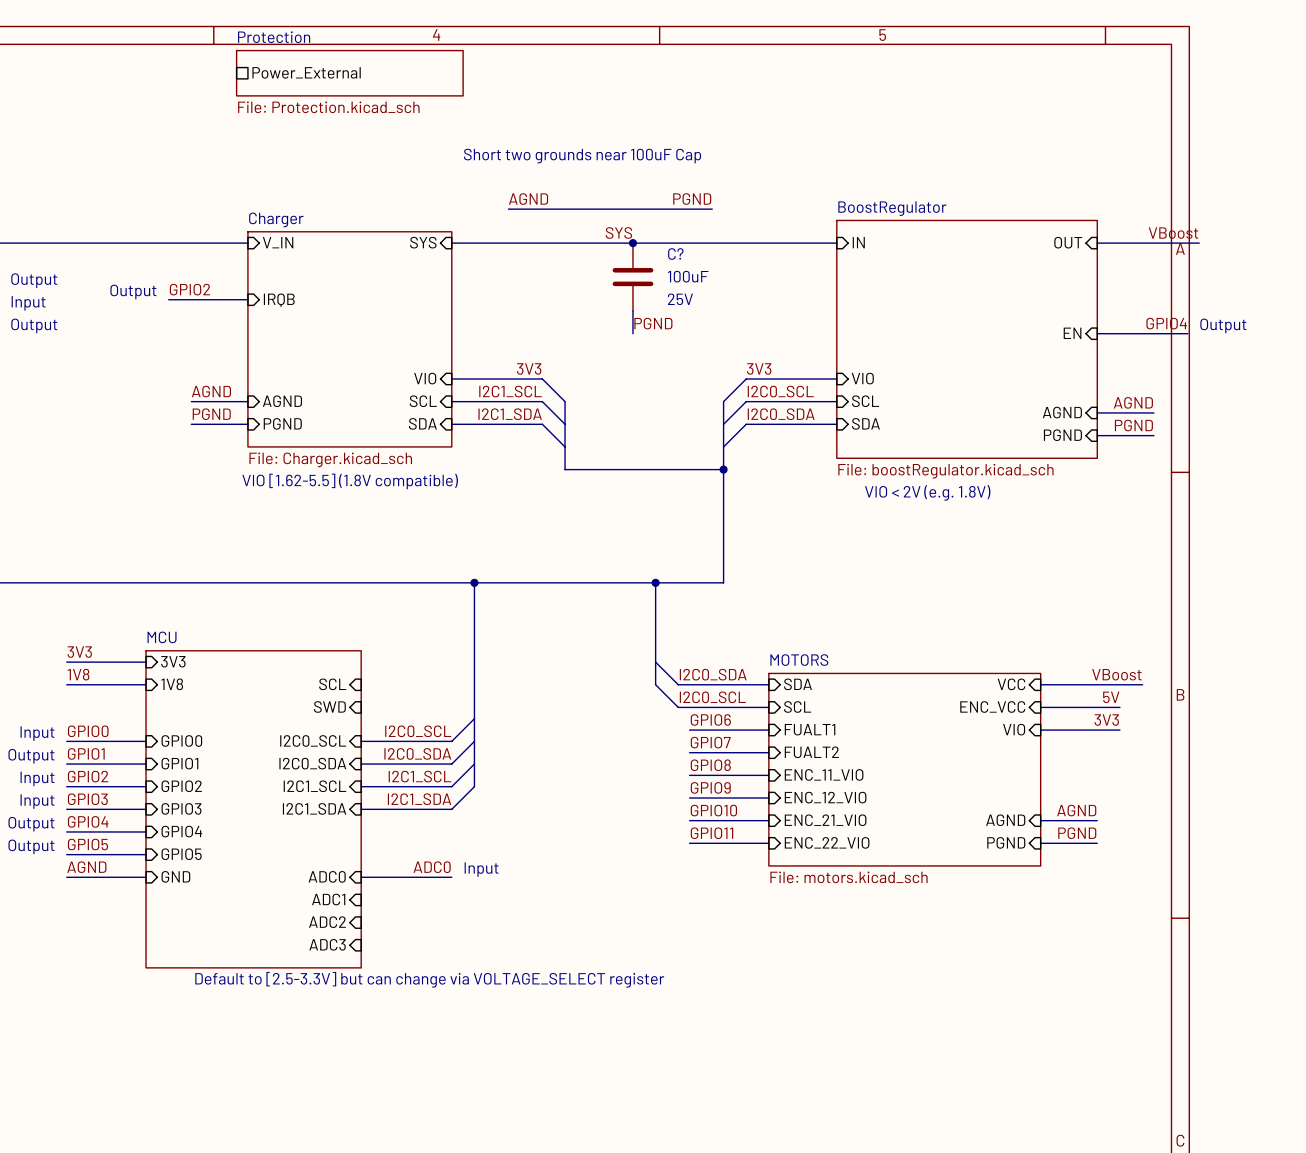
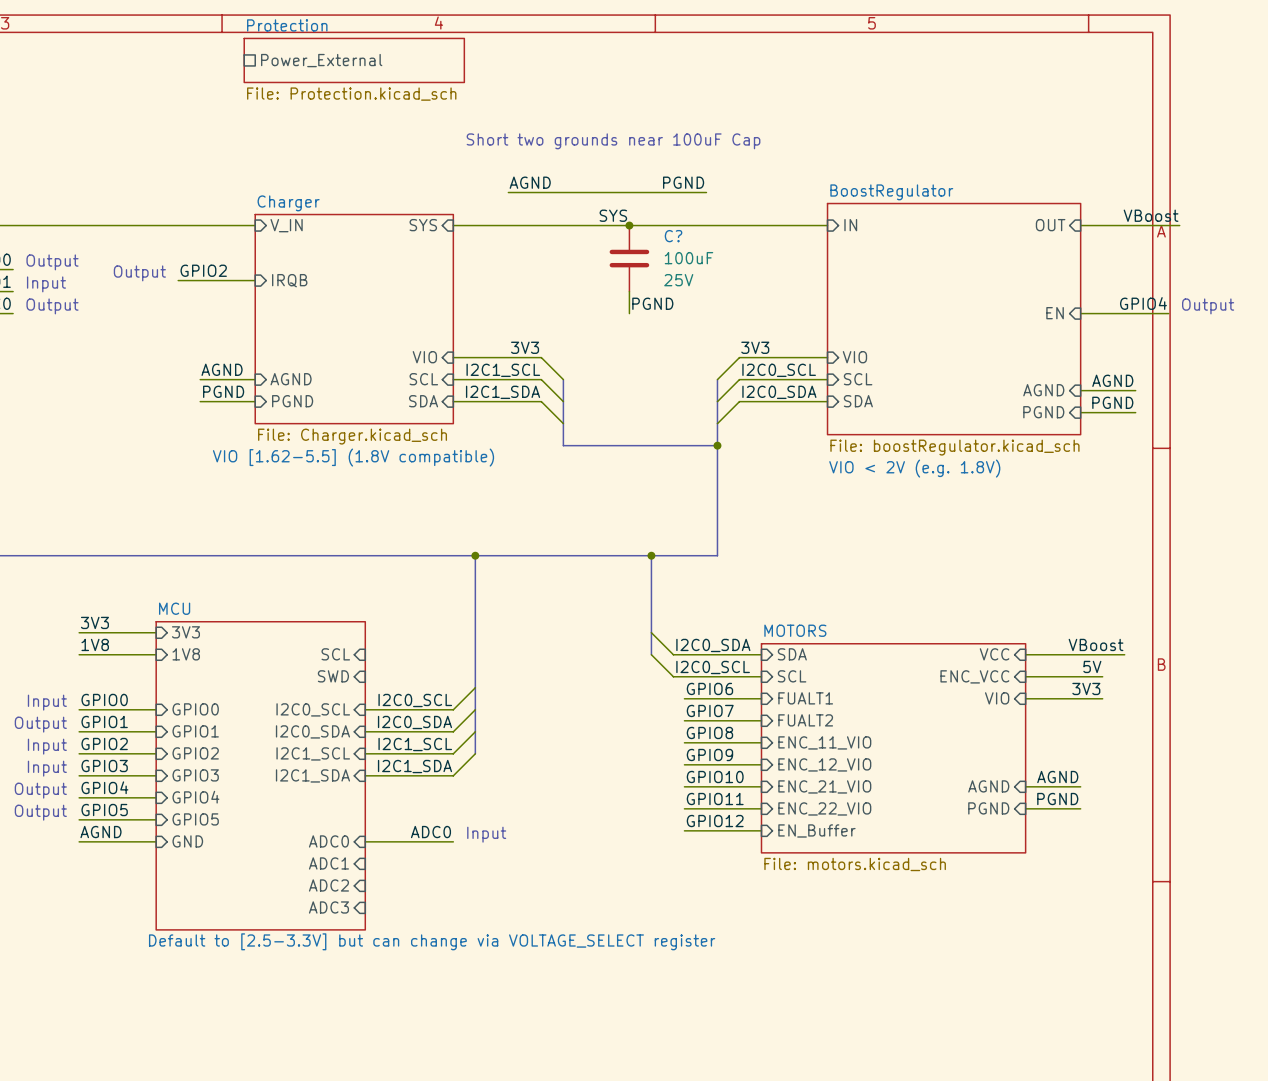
sheet MOTORS: File: motors.kicad_sch (904, 769) -> none
sheet MOTORS: none -> File: motors.kicad_sch (893, 748)
label: none -> GPIO12 (715, 821)
wire: none -> (684, 830) (761, 830)
sheet pin: none -> EN_Buffer (816, 830)

